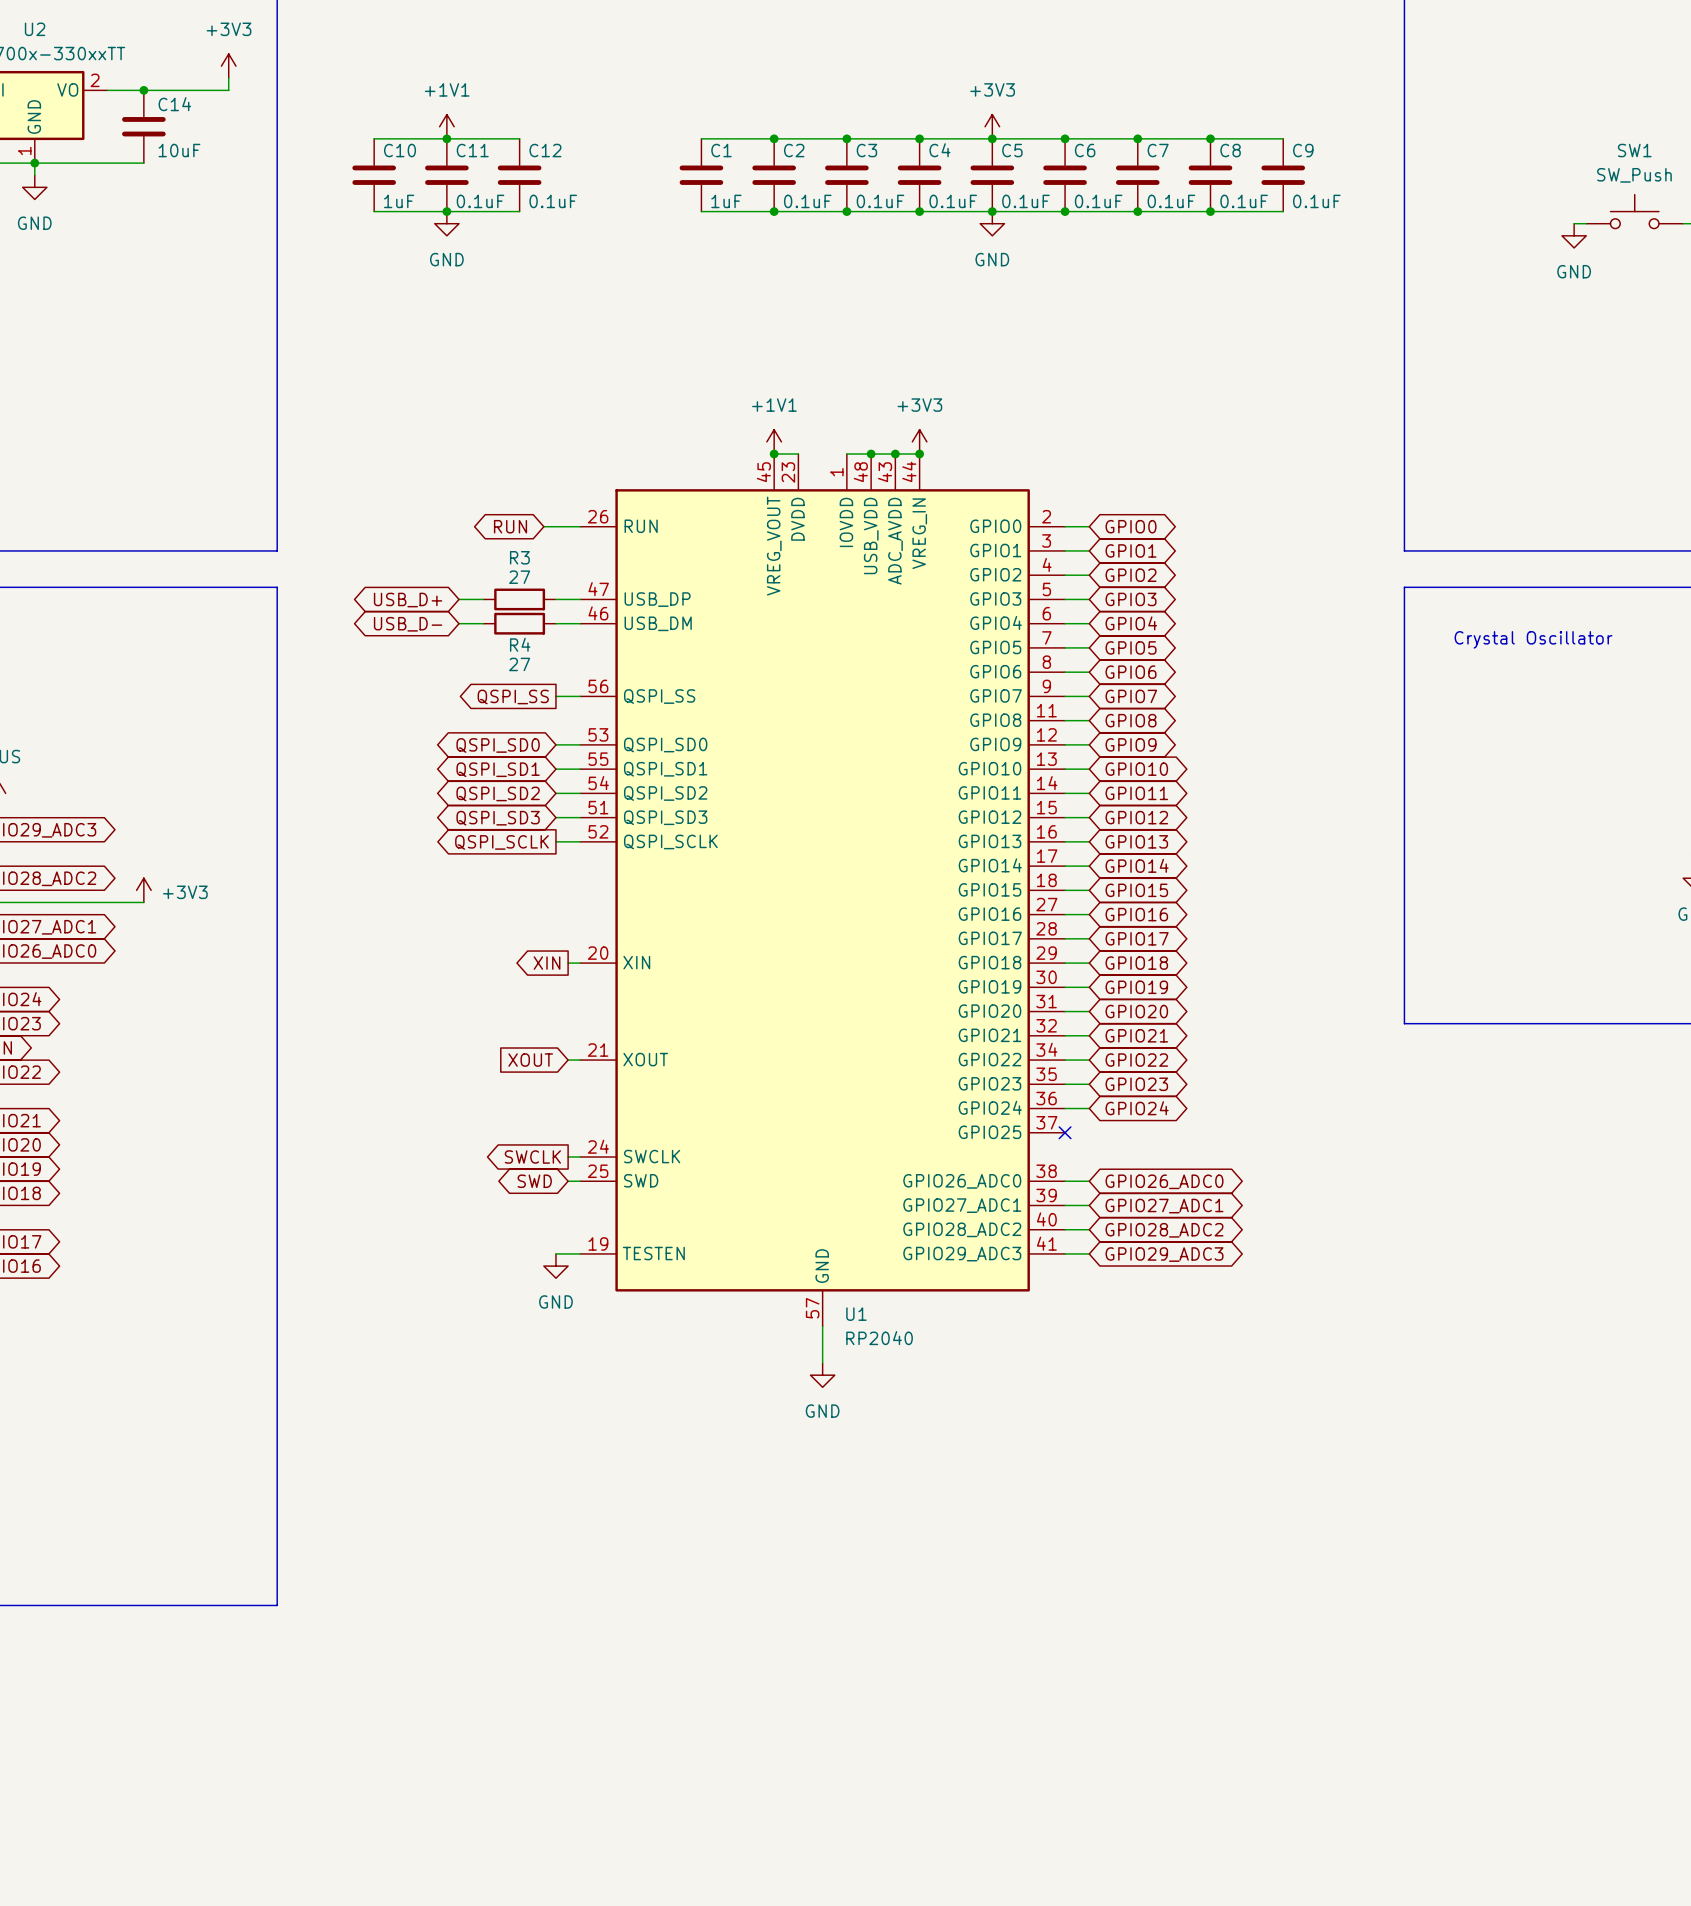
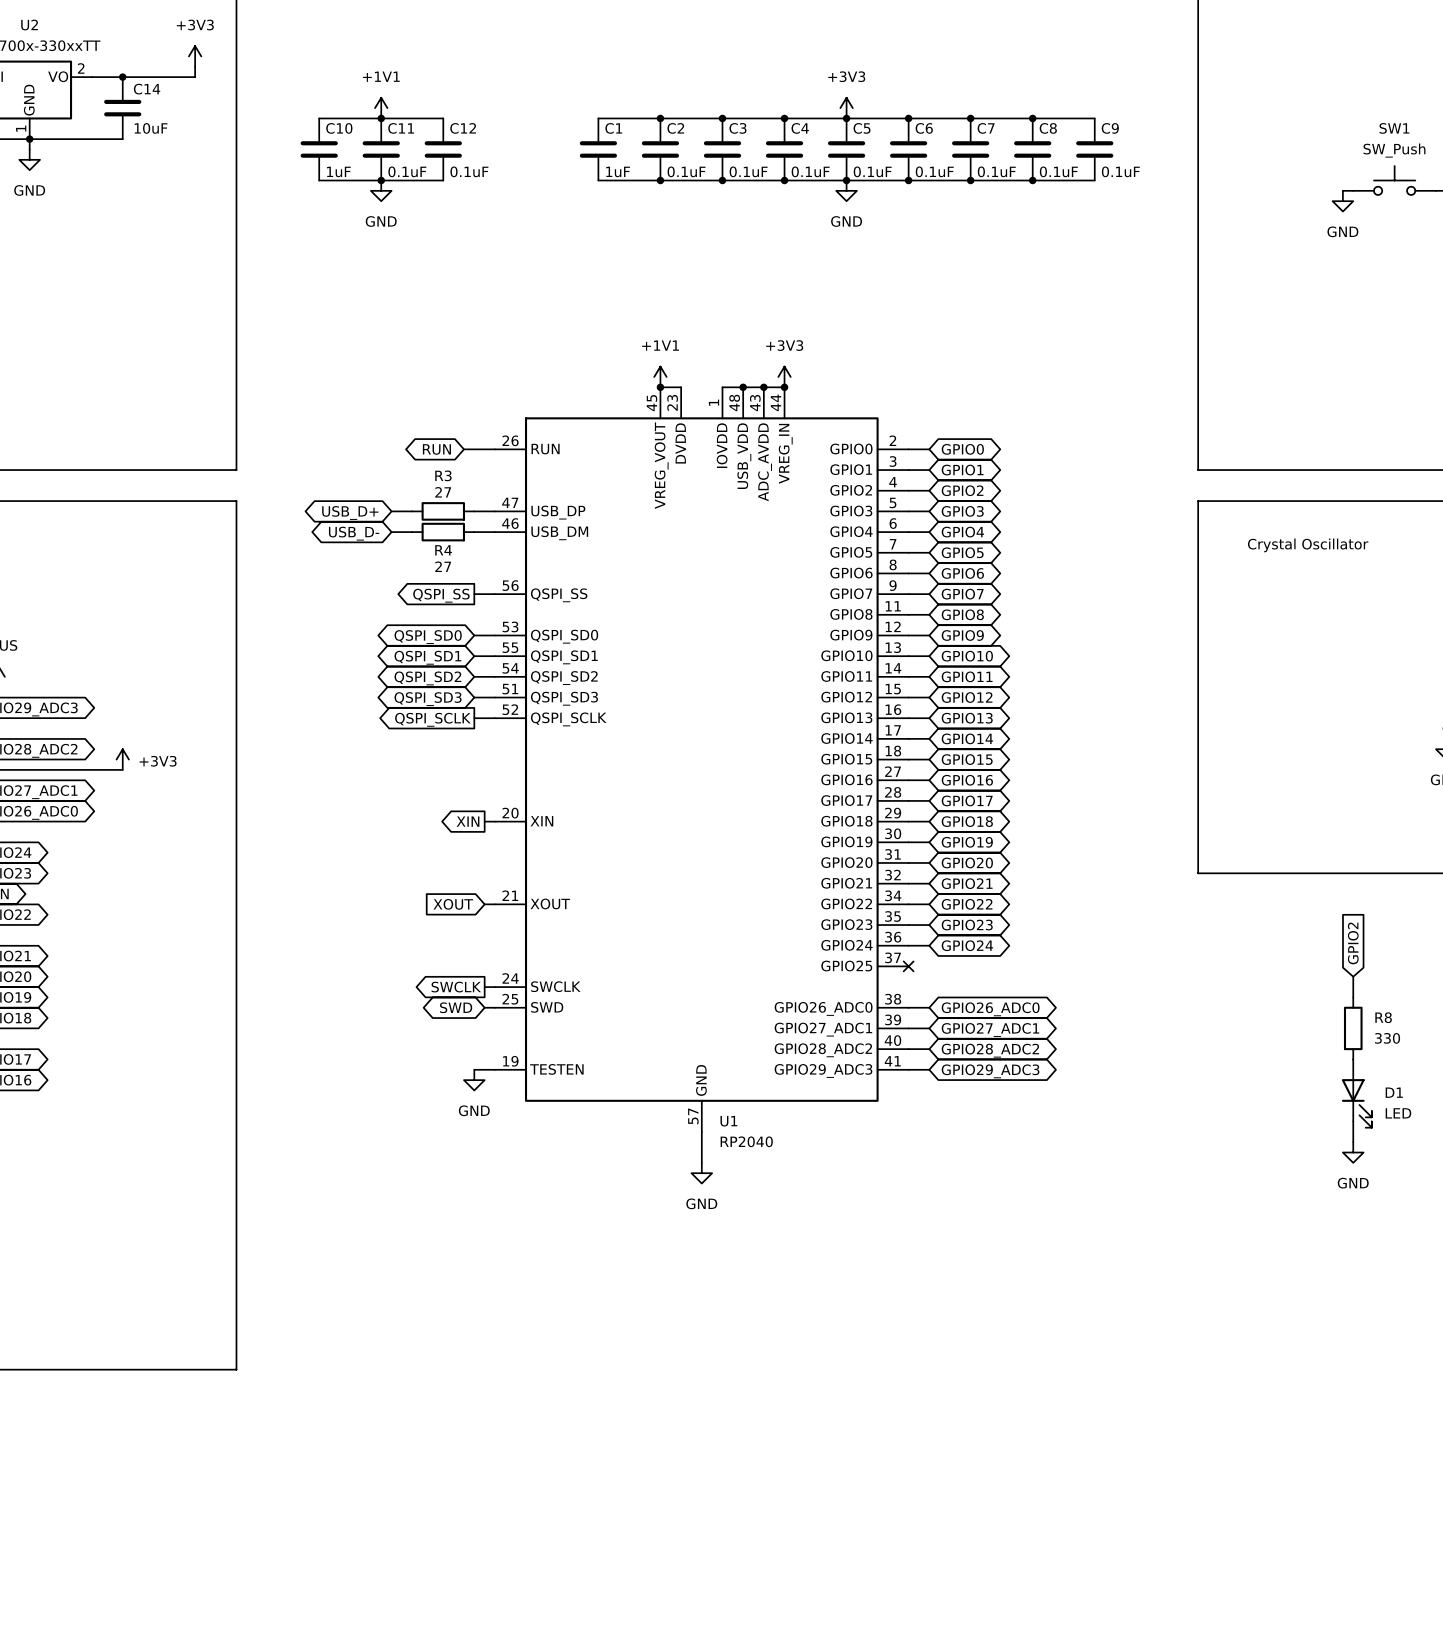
global label: none -> GPIO2 (1353, 943)
wire: none -> (1353, 976) (1353, 997)
R8: none -> 330 (1353, 1028)
D1: none -> LED (1356, 1093)
wire: none -> (1353, 1121) (1353, 1142)
power symbol: none -> GND (1353, 1152)

